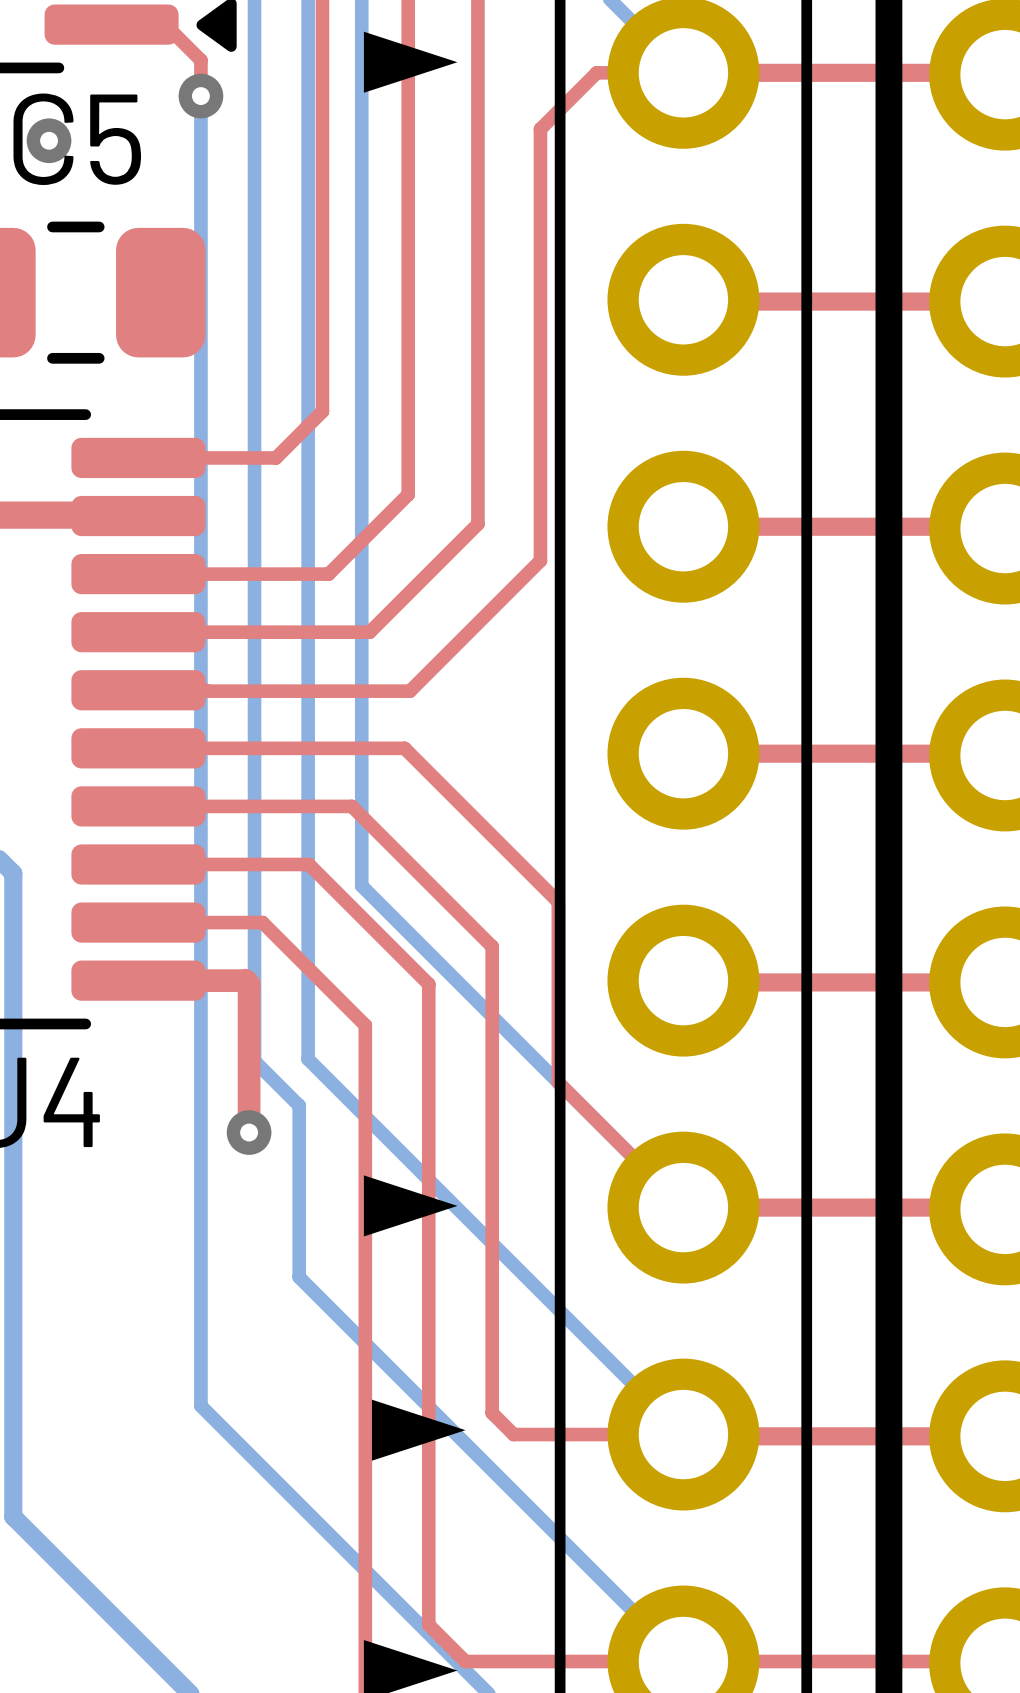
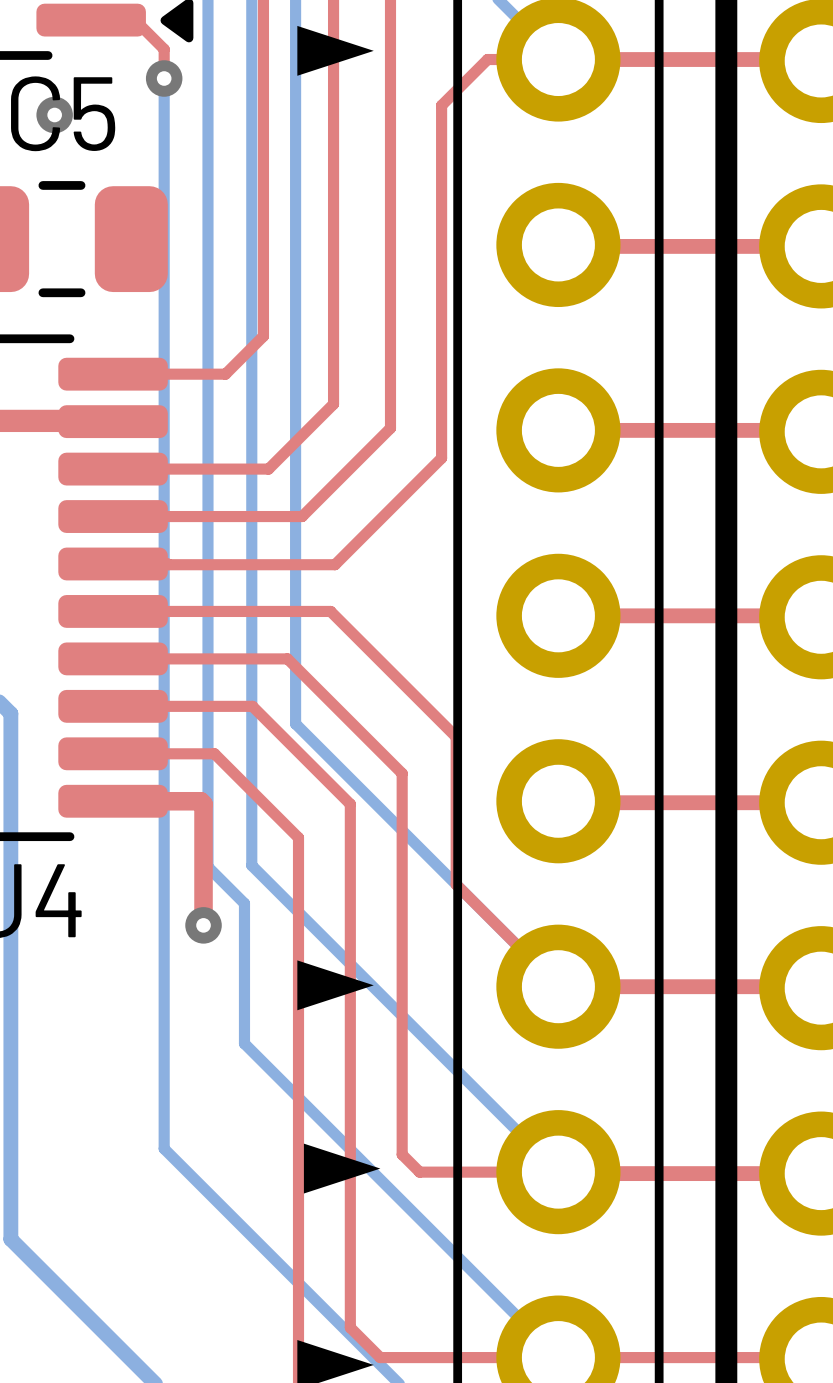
via position: (49, 140) -> (54, 115)

